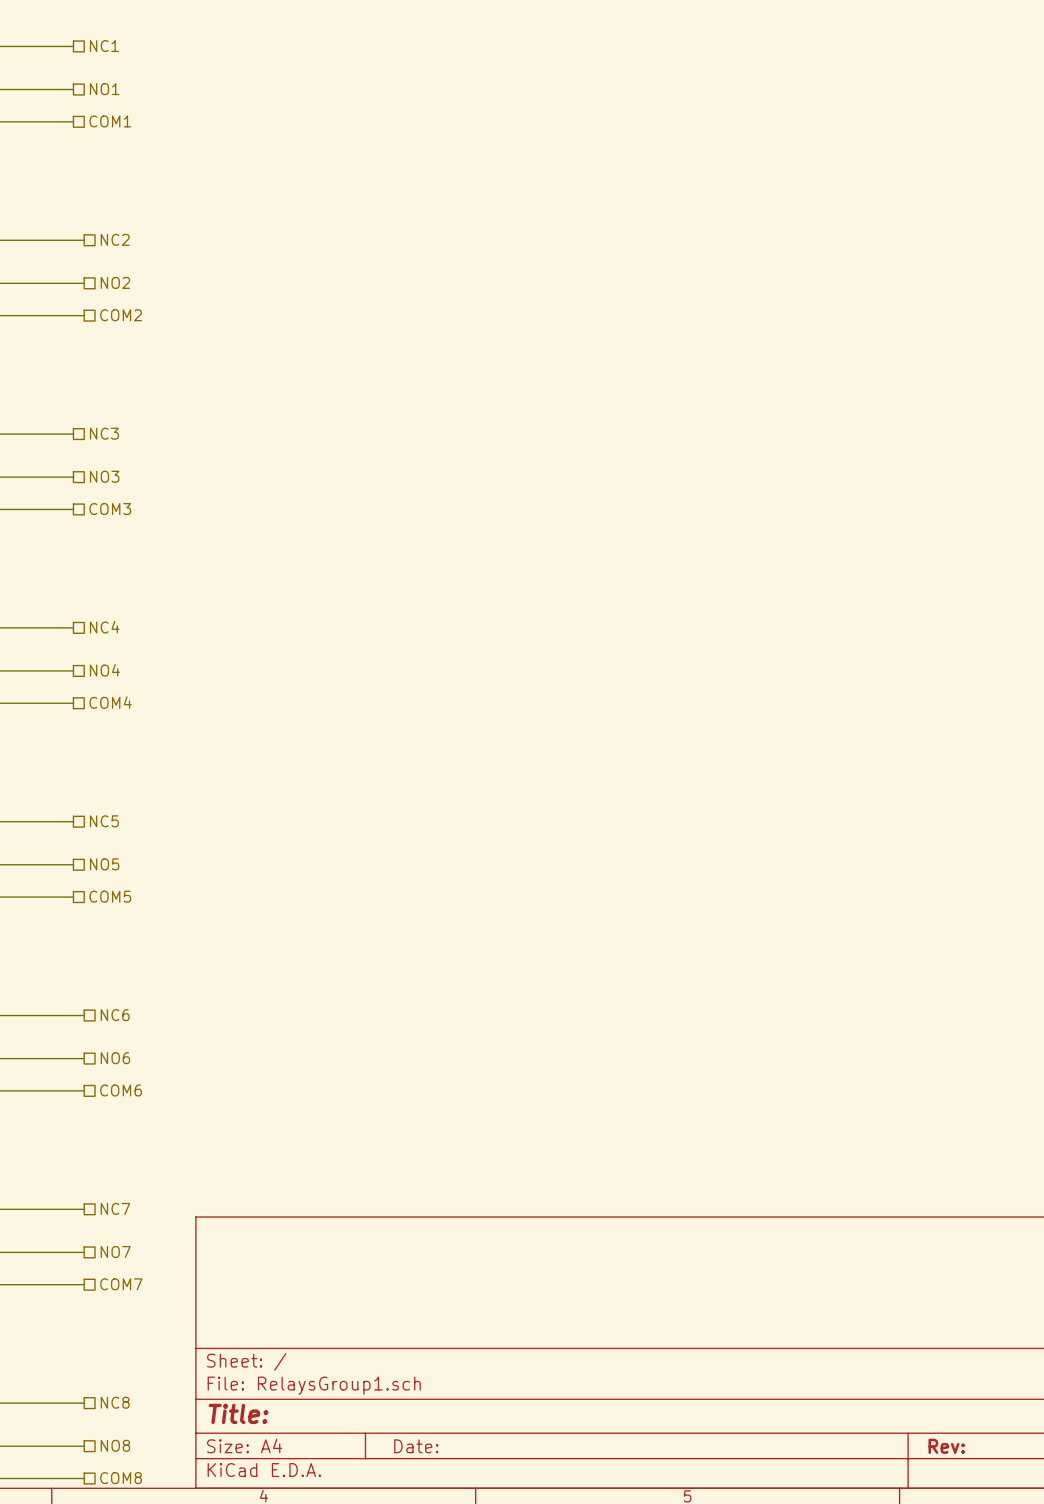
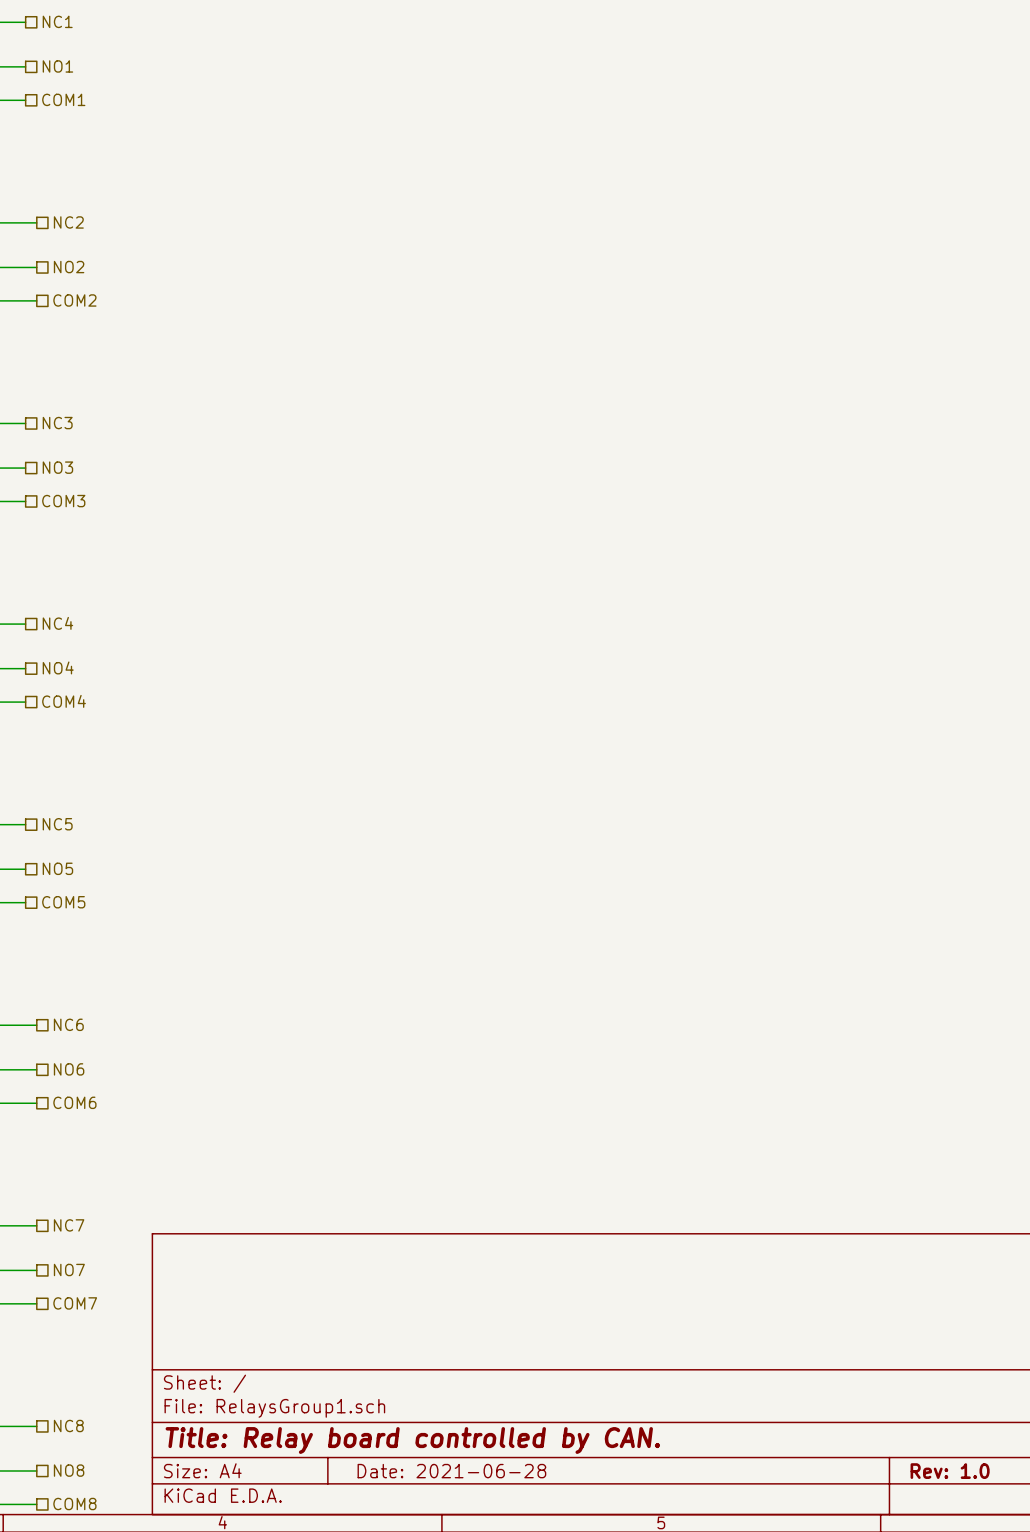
title block: Title: (238, 1413) -> Title: Relay board controlled by CAN. (412, 1440)
title block: Date: (416, 1446) -> Date: 2021-06-28 (451, 1471)
title block: Rev: (946, 1446) -> Rev: 1.0 (950, 1471)

